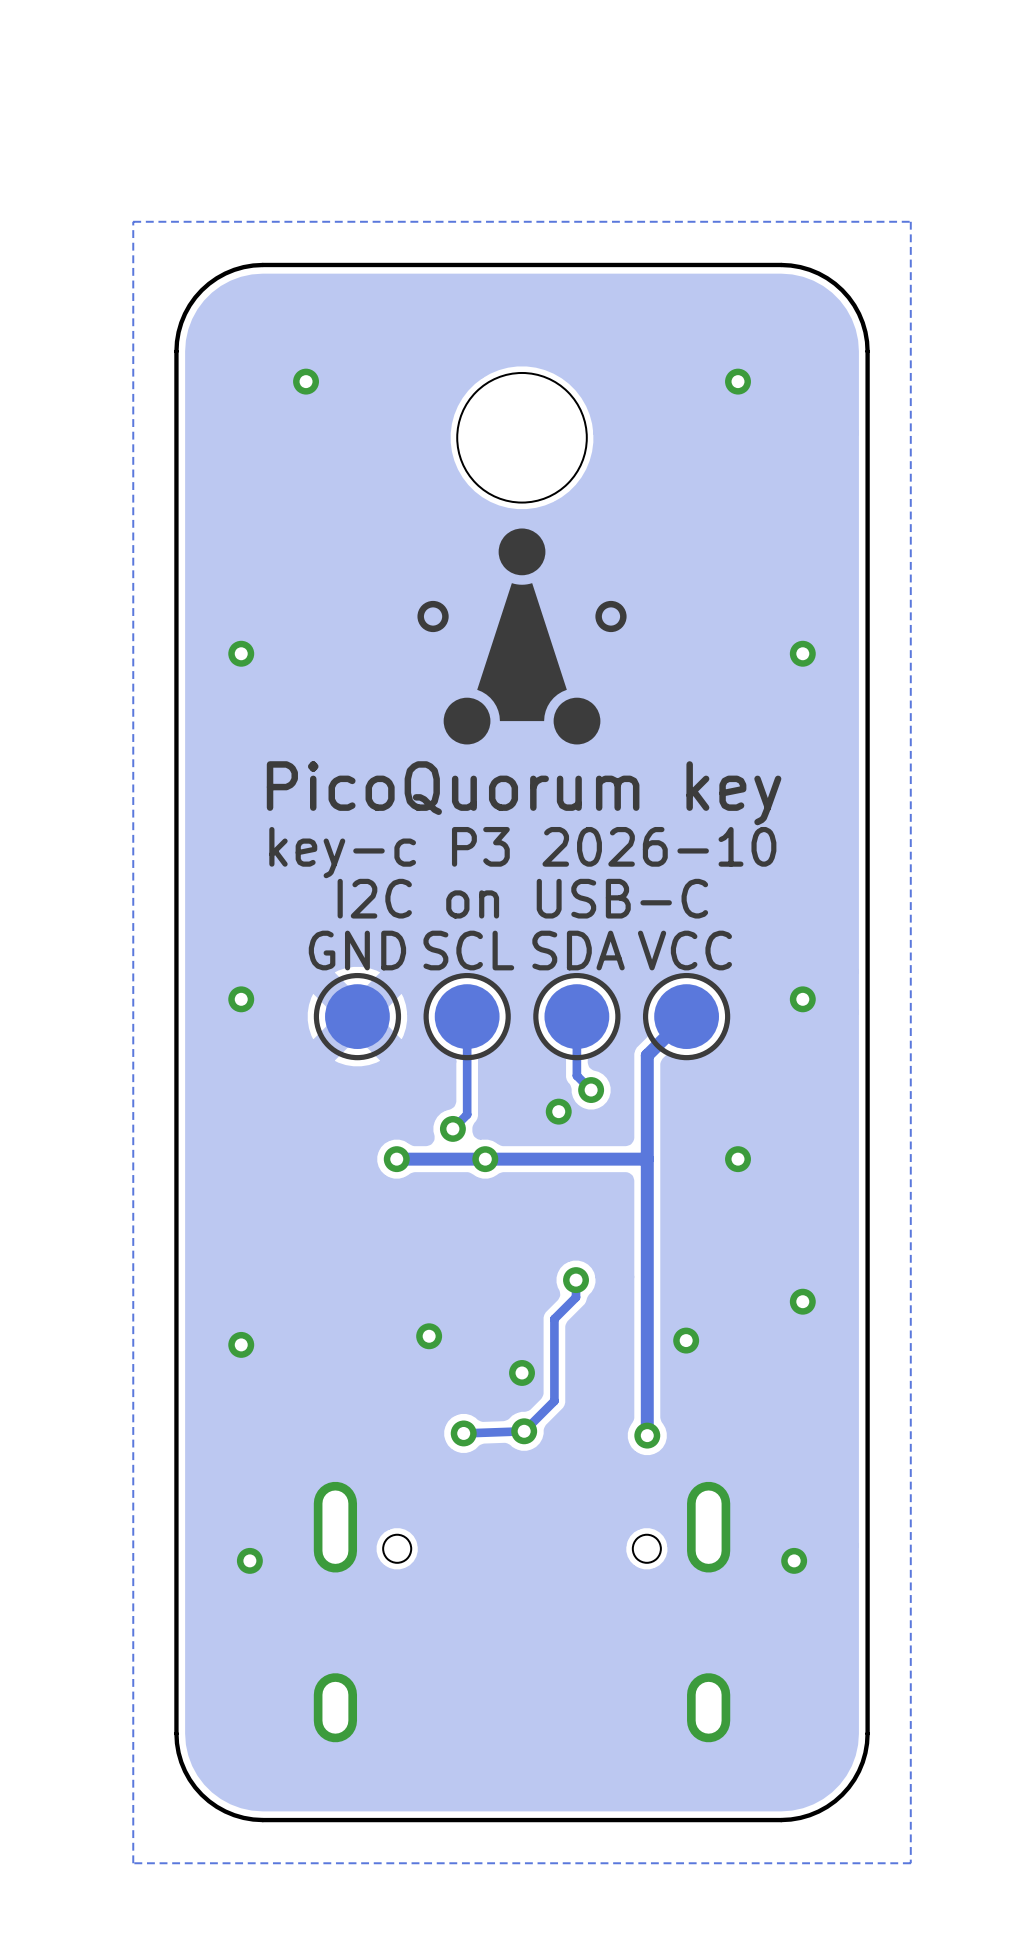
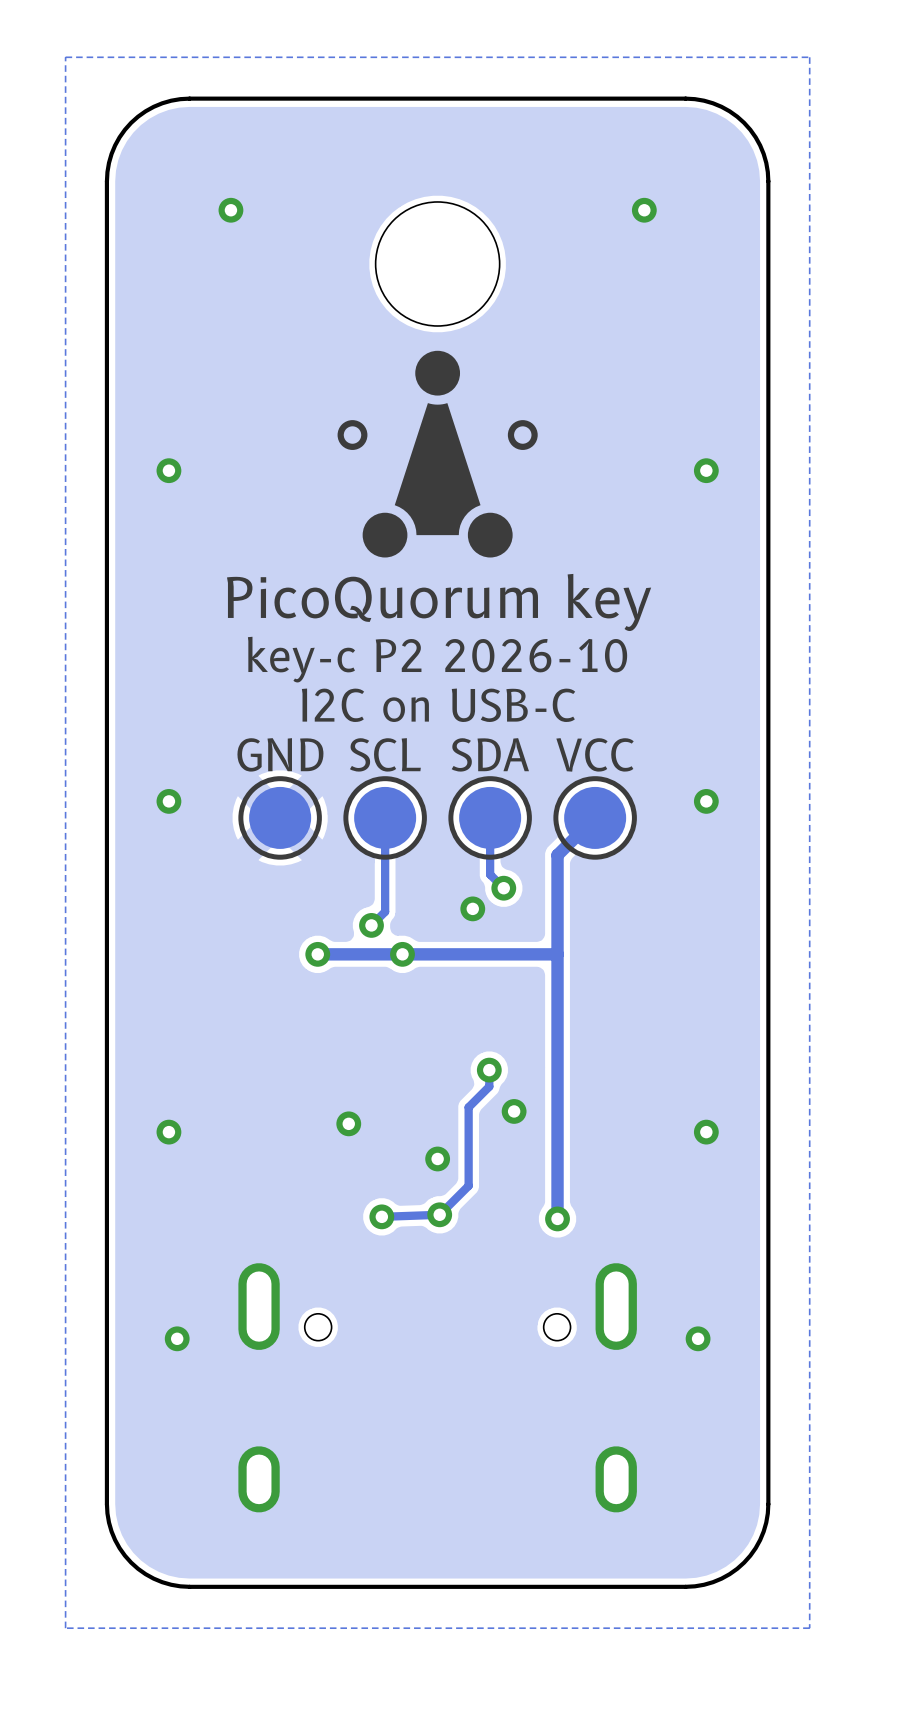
text: key-c P3 2026-10 (522, 852) -> key-c P2 2026-10 (437, 659)
via: (738, 1159) -> none
via position: (802, 1301) -> (706, 1132)
via: none -> (514, 1111)
via: (686, 1340) -> none

